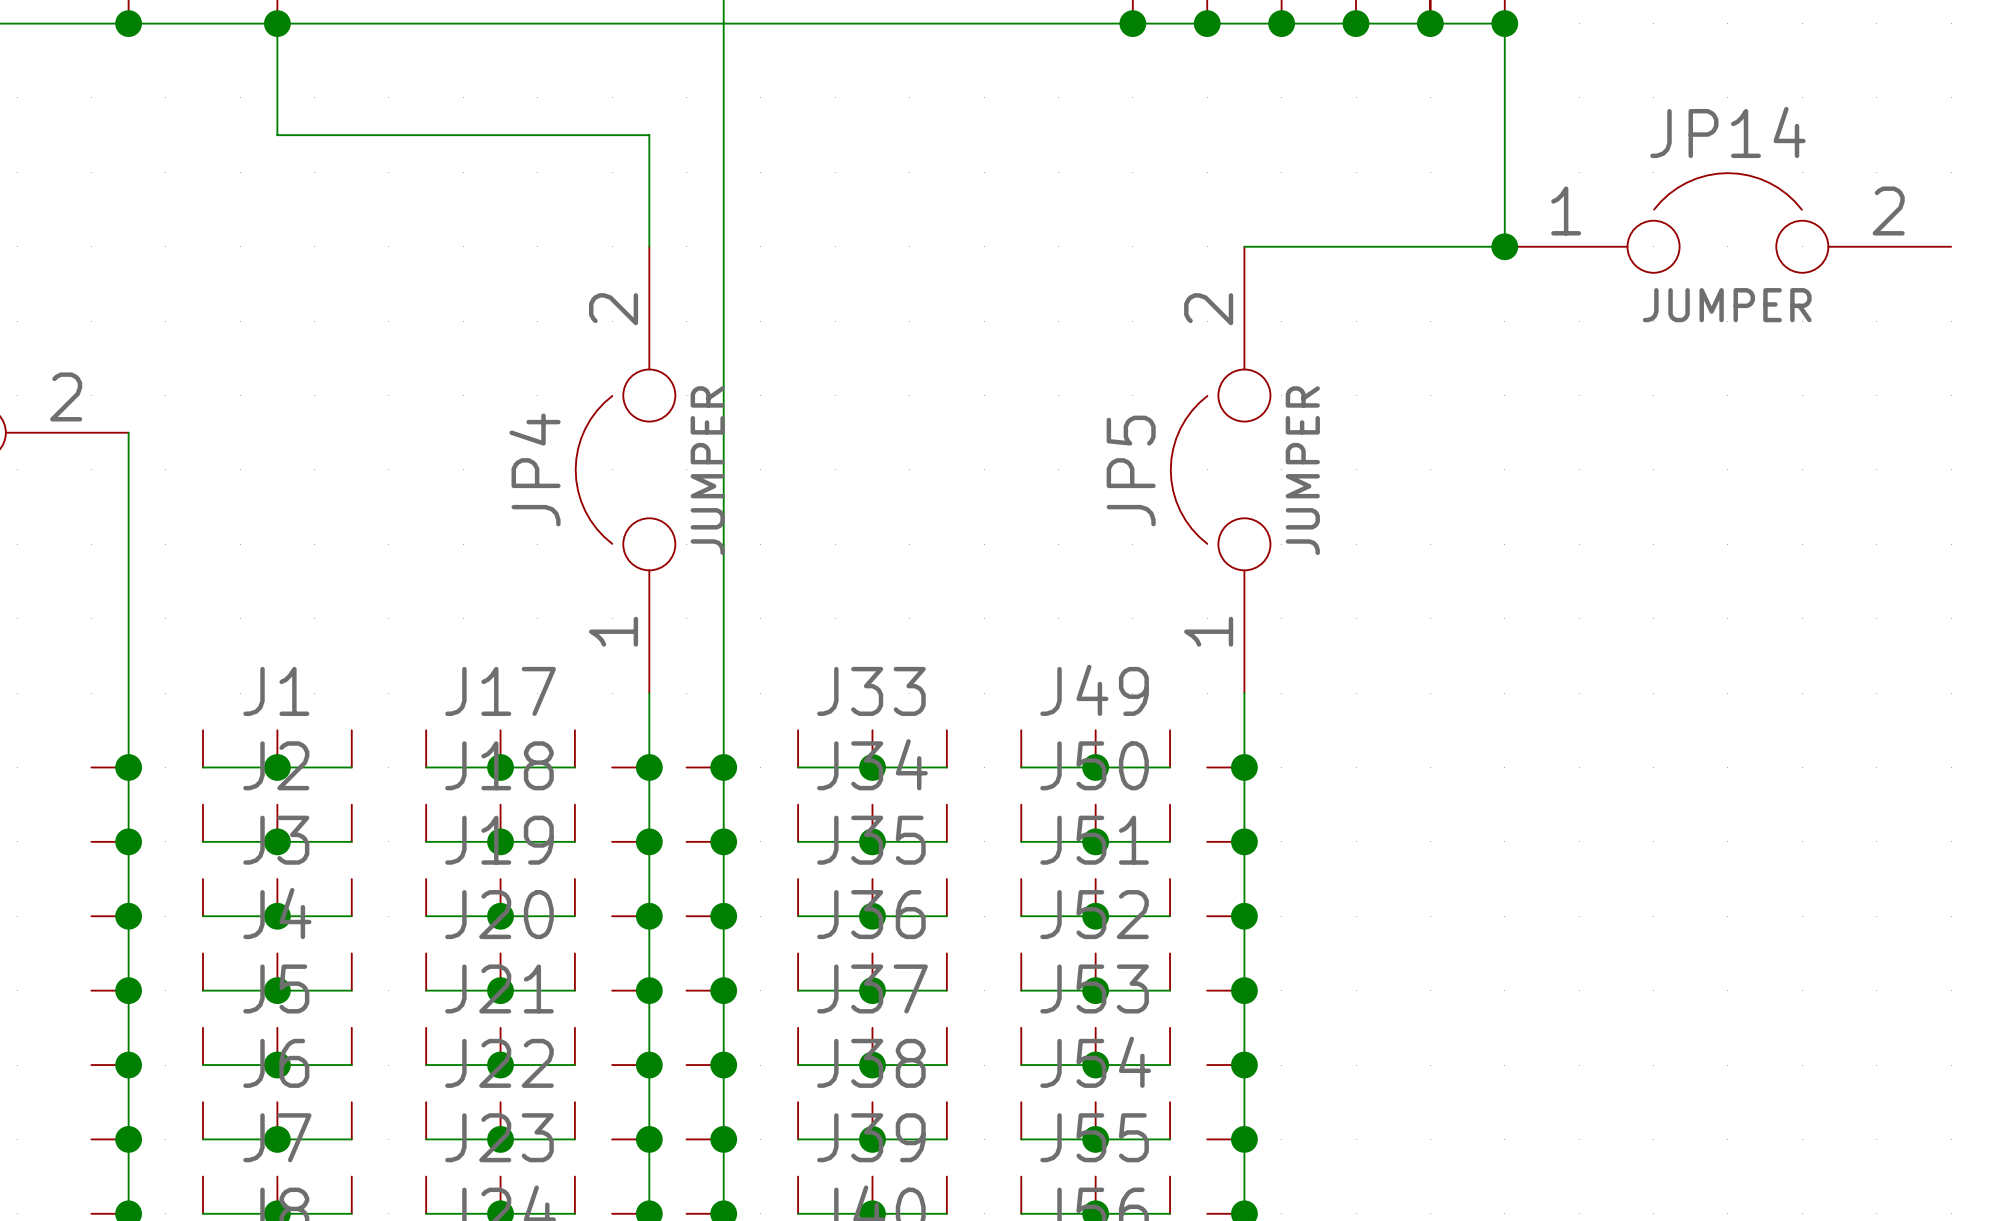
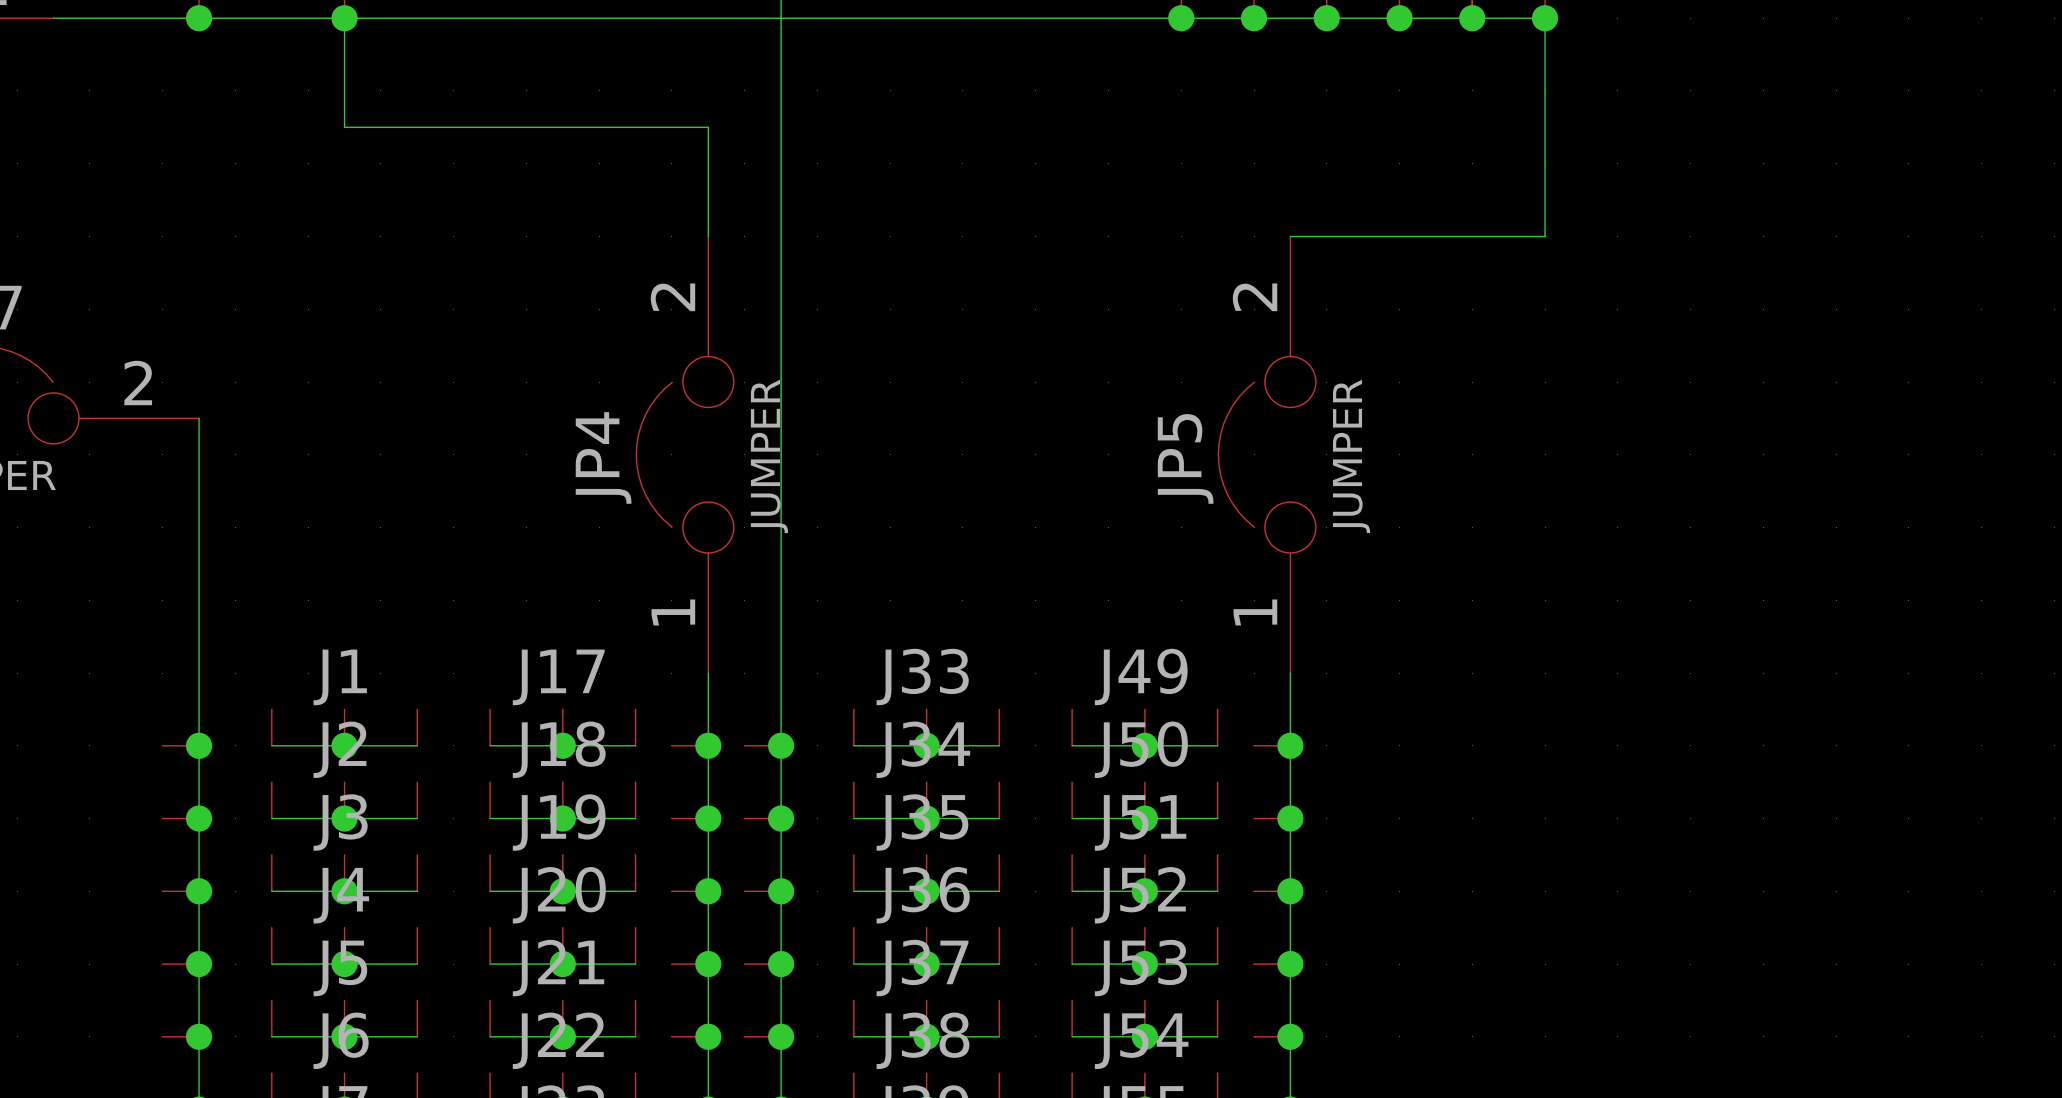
JP14: JUMPER (1727, 222) -> none
junction: (1504, 246) -> none

